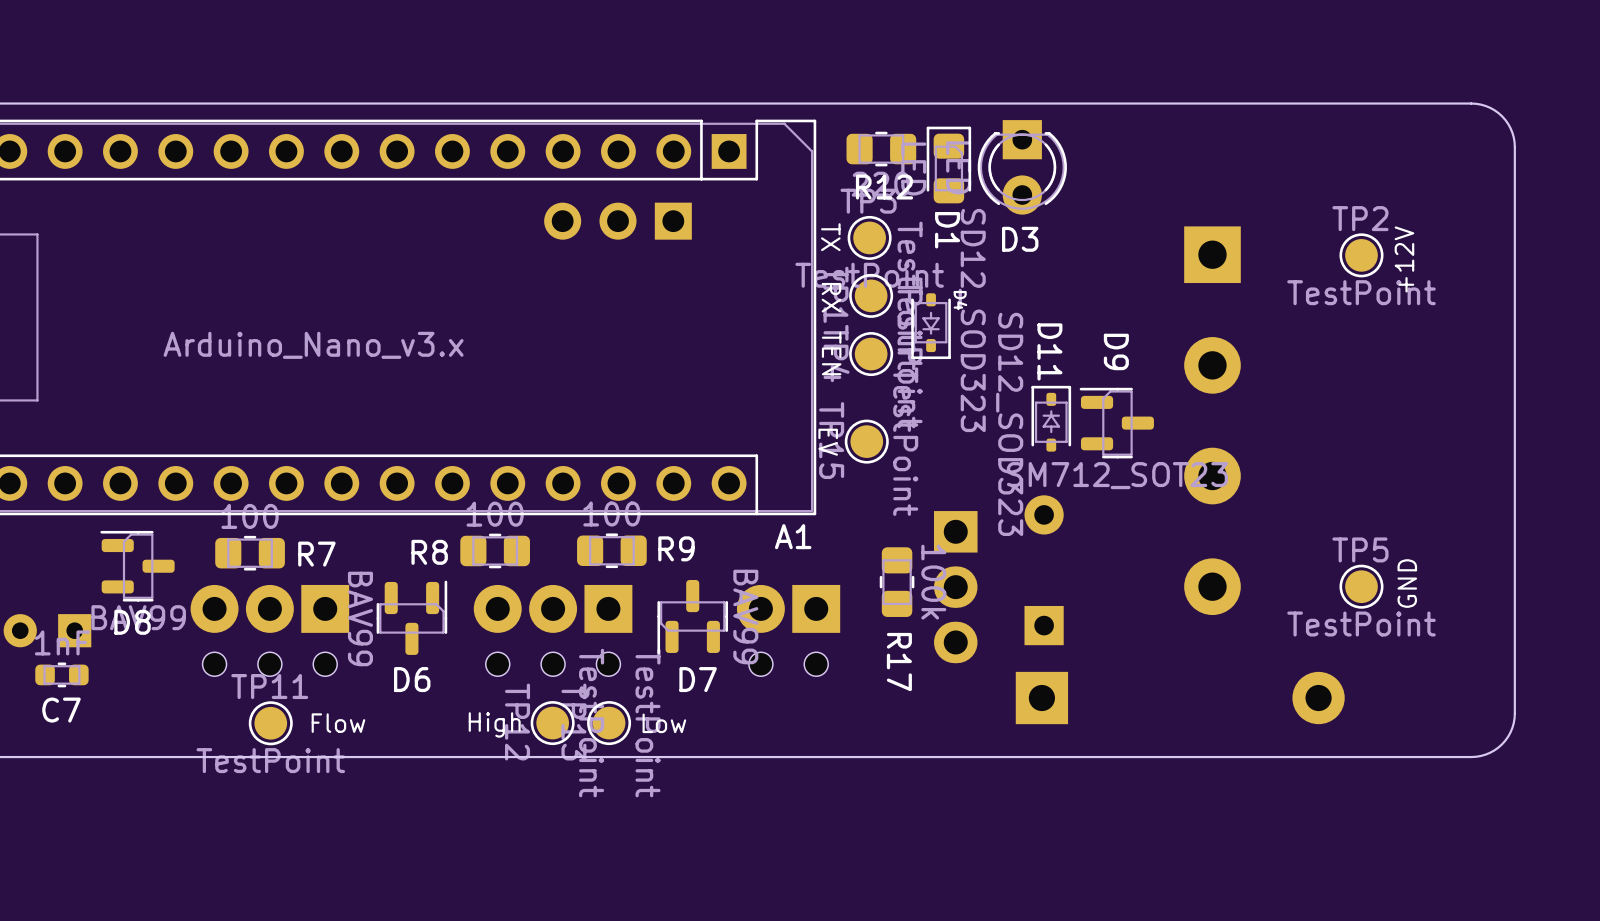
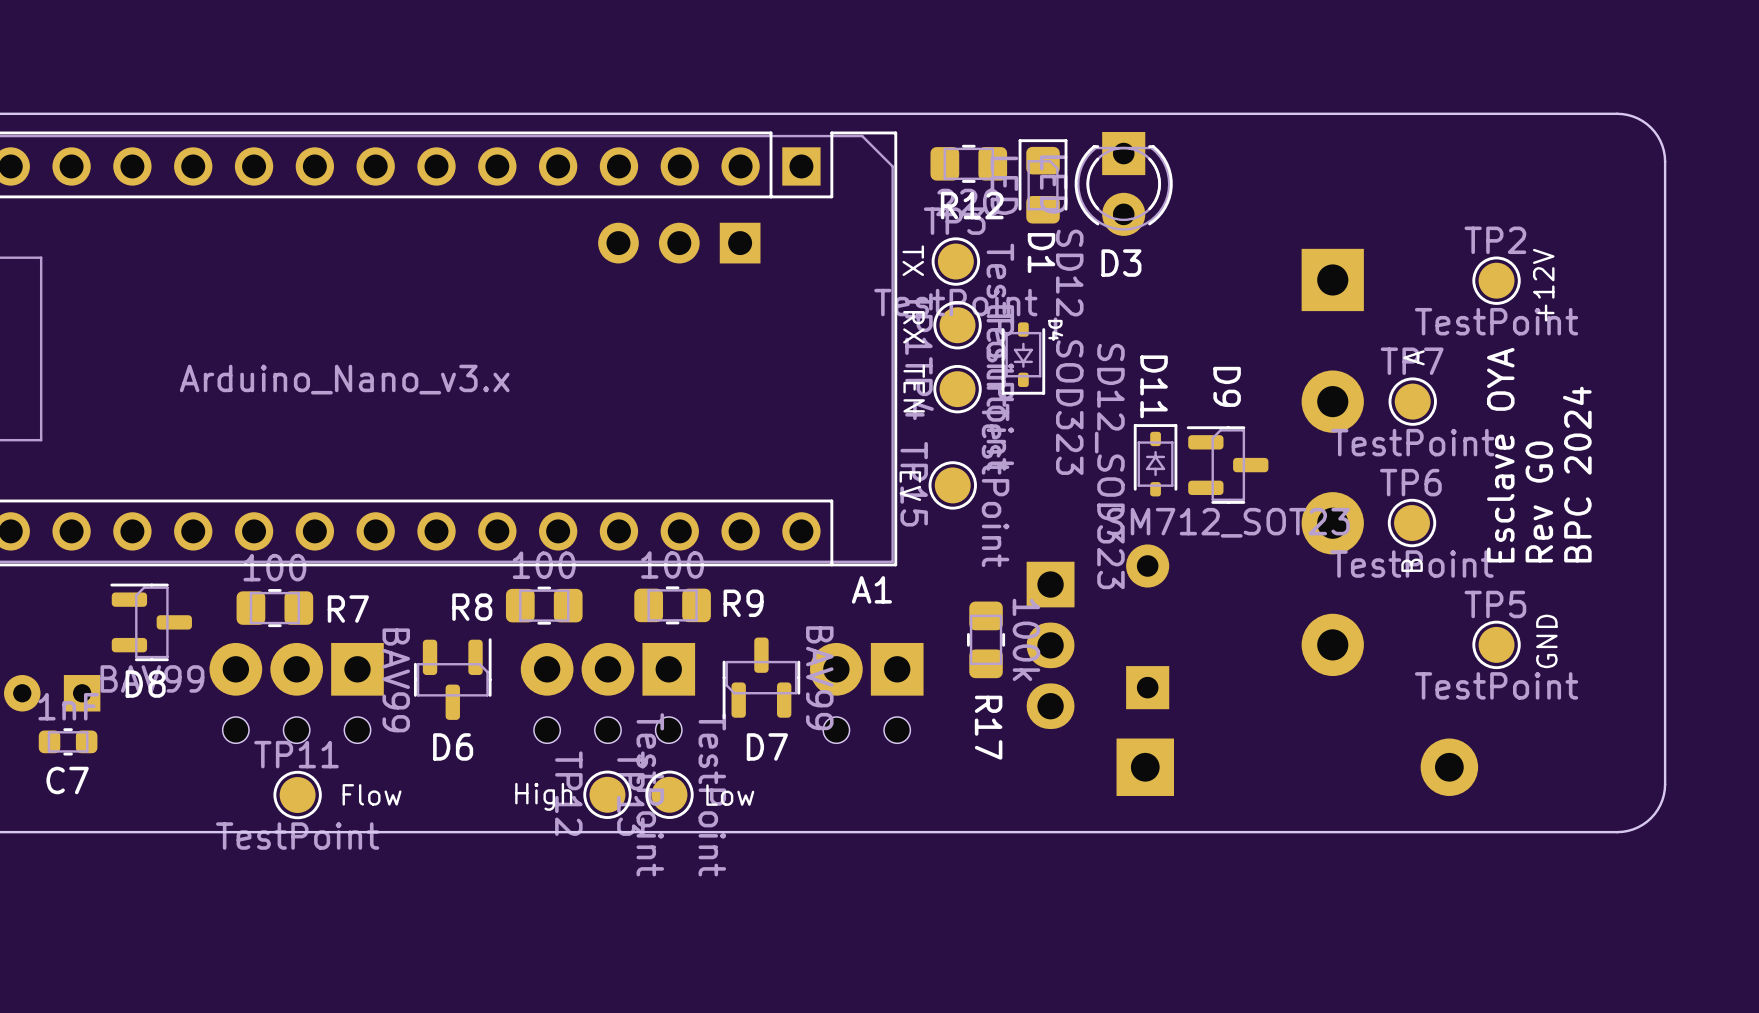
text: none -> A (1413, 357)
TP7: none -> TestPoint (1412, 401)
text: none -> Esclave OYA (1500, 455)
text: none -> BPC 2024 (1577, 474)
text: none -> Rev G0 (1539, 501)
TP6: none -> TestPoint (1412, 523)
text: none -> B (1412, 565)

